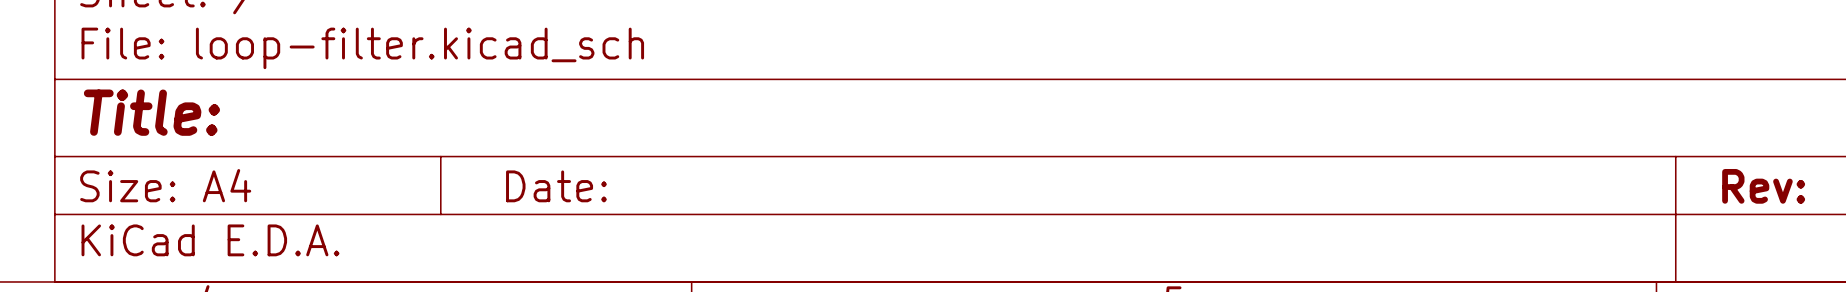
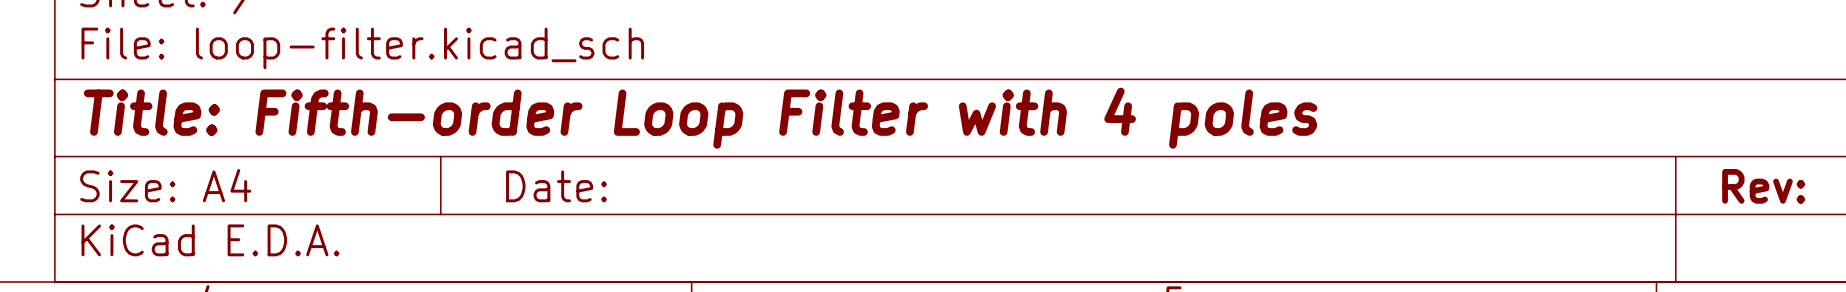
title block: Title: (151, 112) -> Title: Fifth-order Loop Filter with 4 poles (700, 118)

